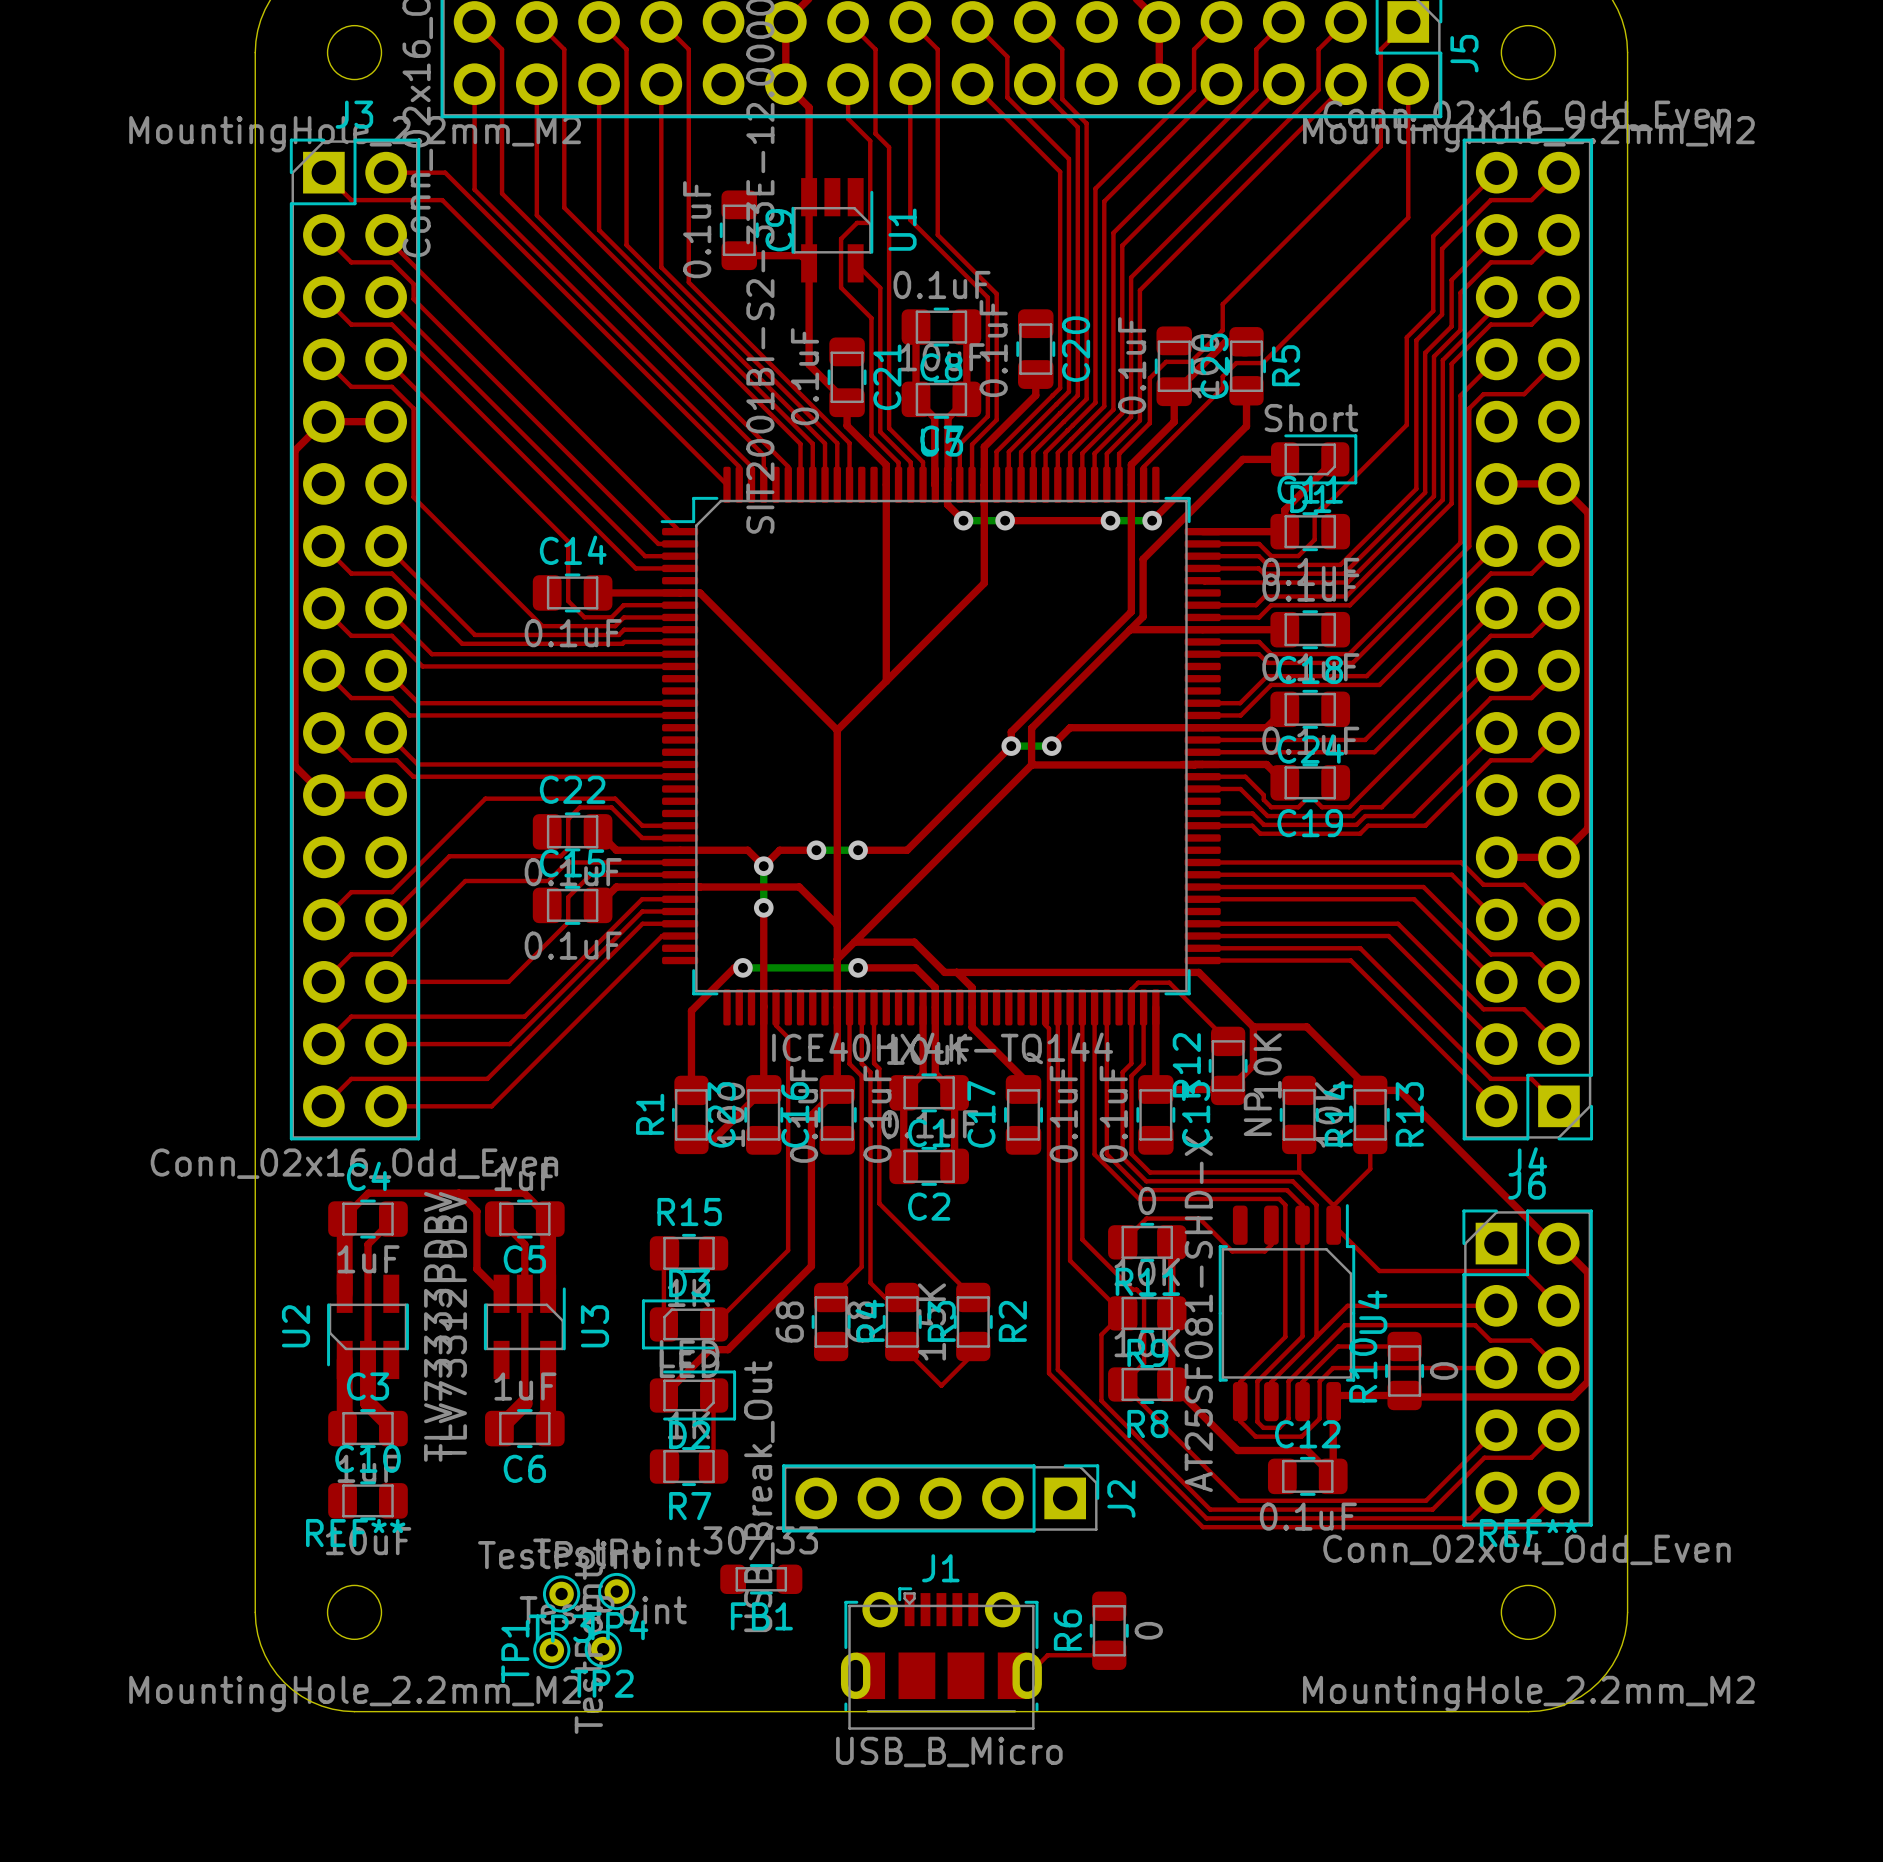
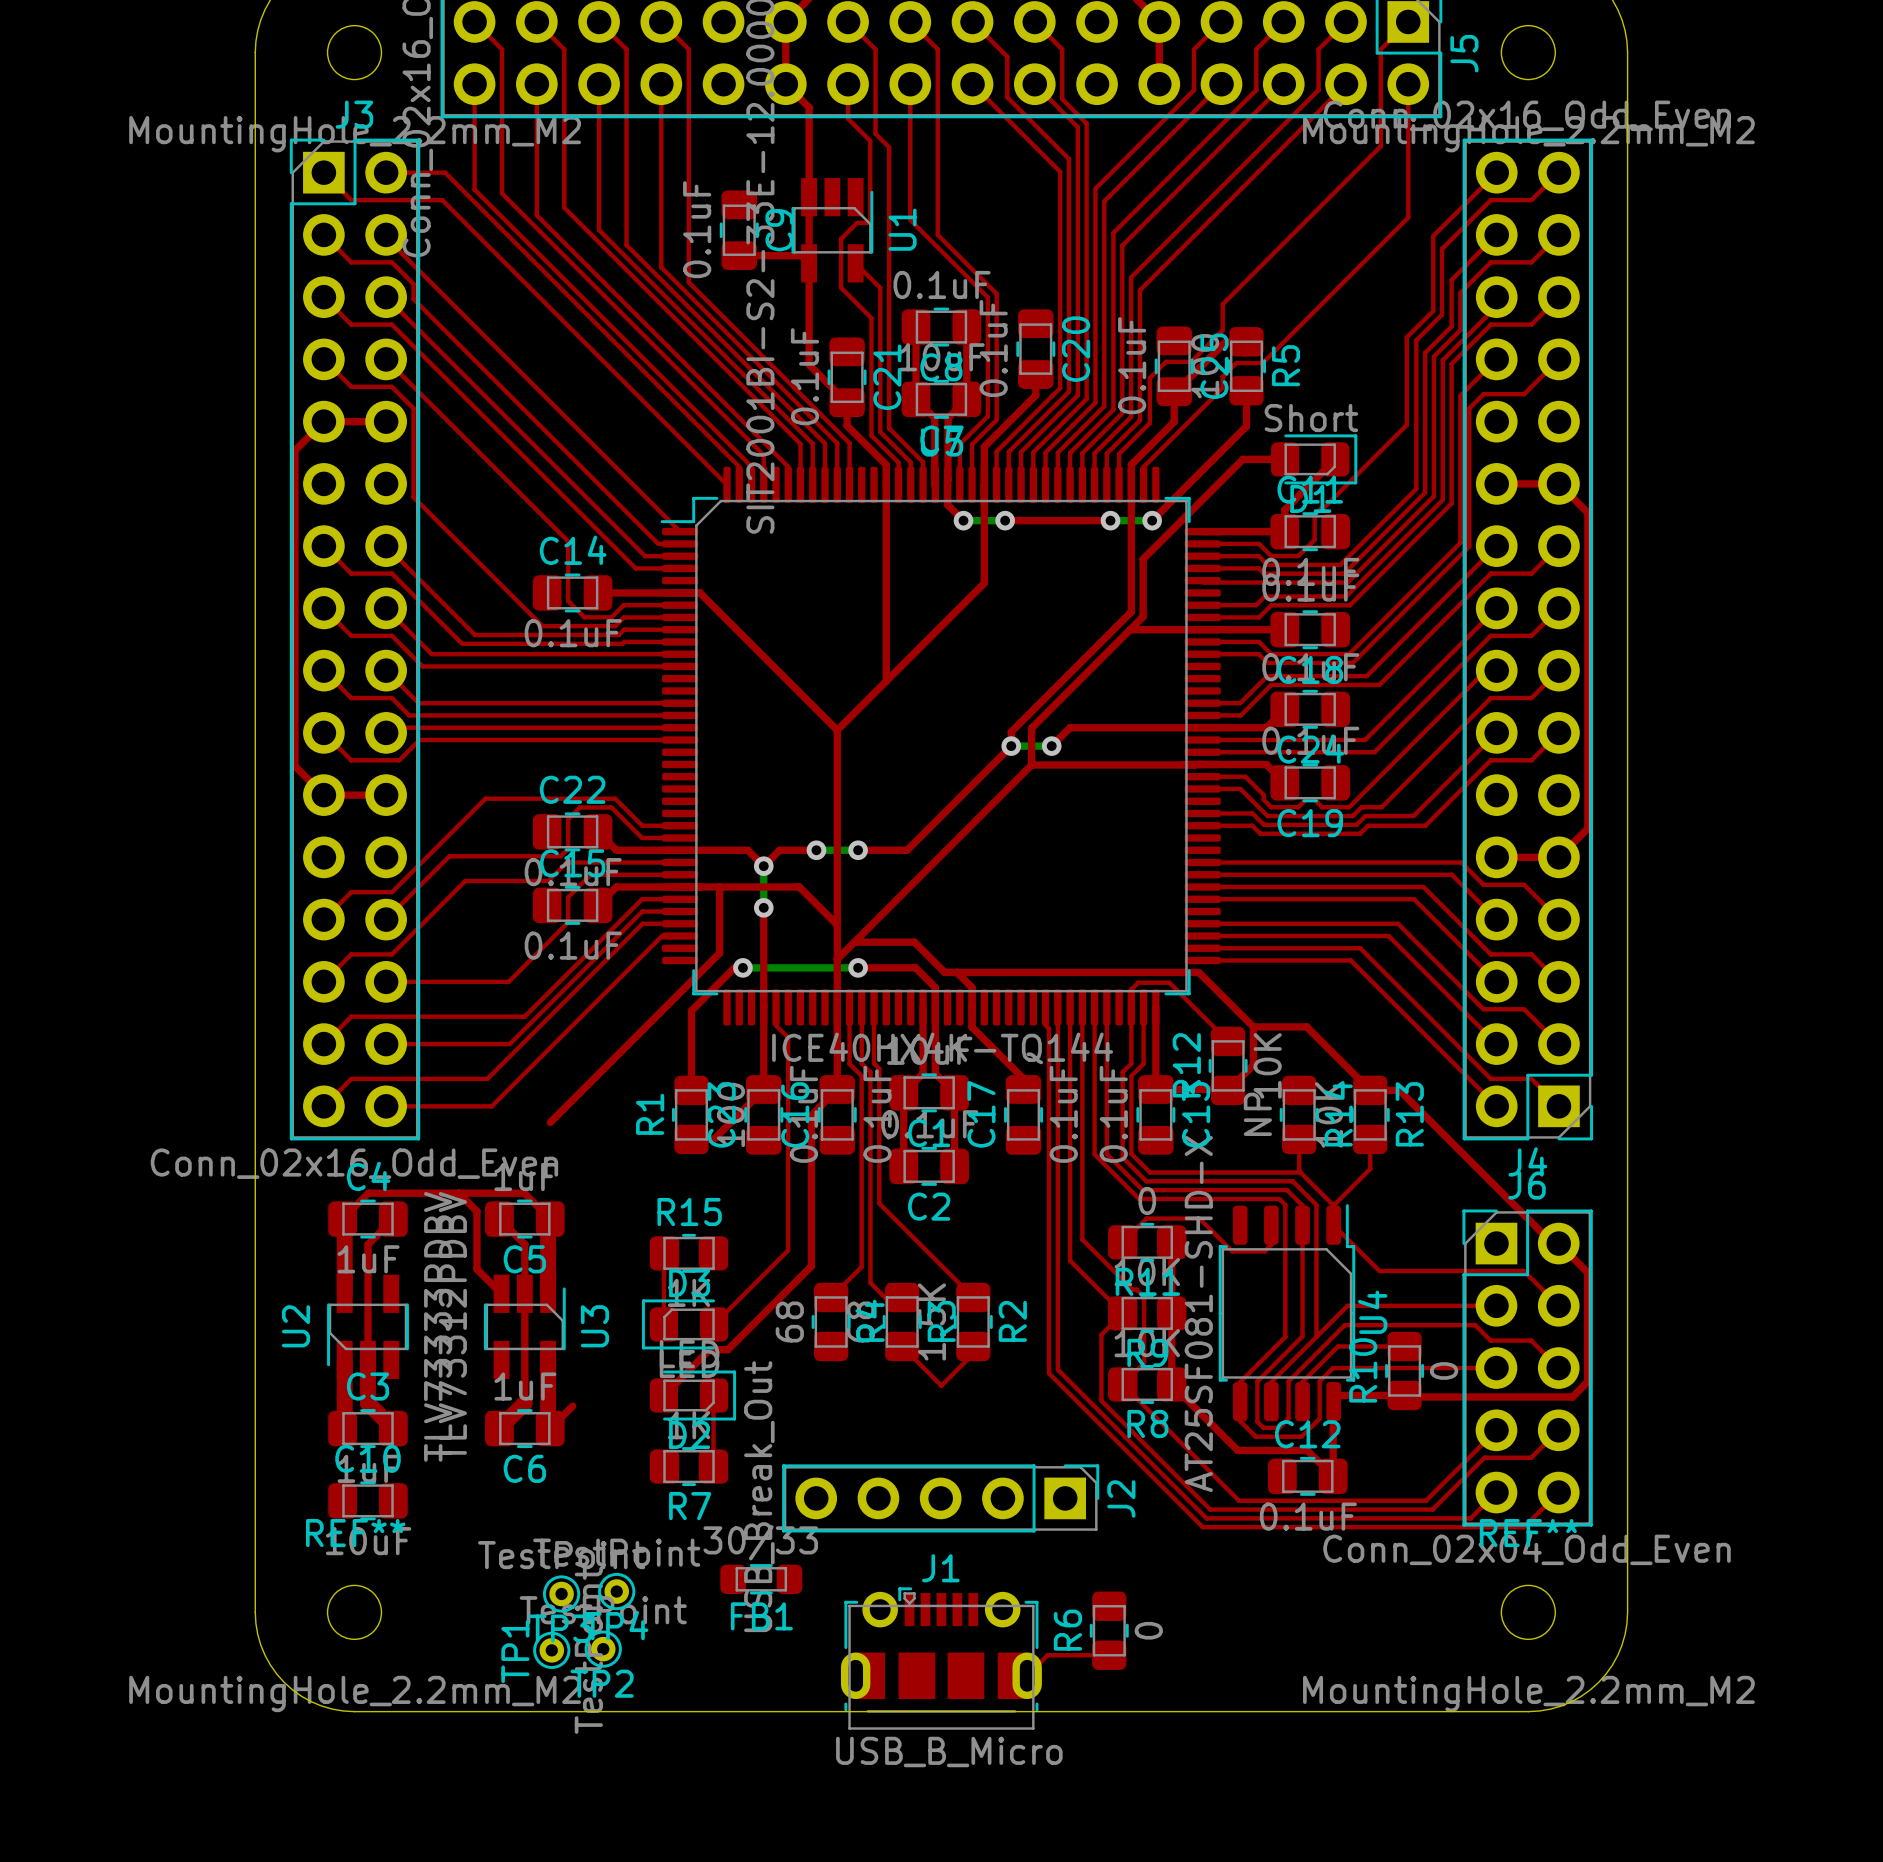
top track: none -> (391, 727) (680, 727)
top track: (386, 732) (417, 764) (680, 764) -> none
top track: (396, 760) (413, 776) (680, 776) -> (396, 760) (399, 760) (419, 739) (680, 739)
top track: none -> (719, 887) (719, 953) (550, 1122)
top track: none -> (572, 1406) (550, 1428)

